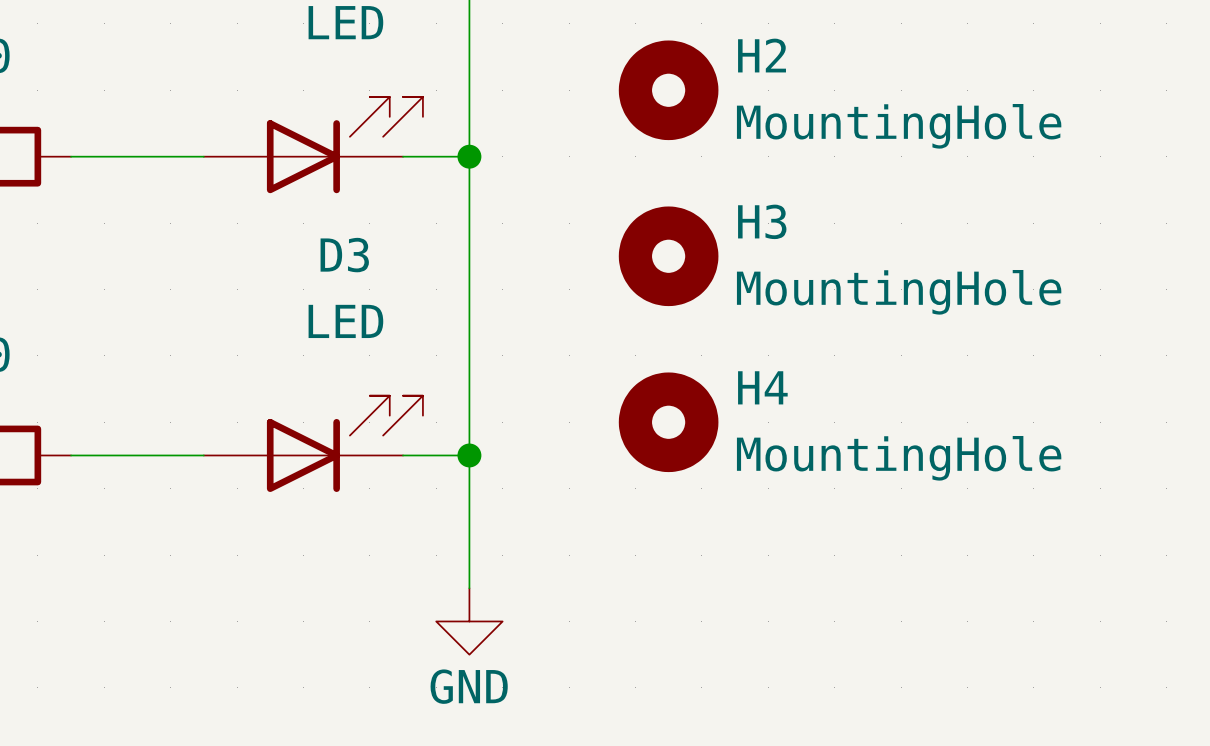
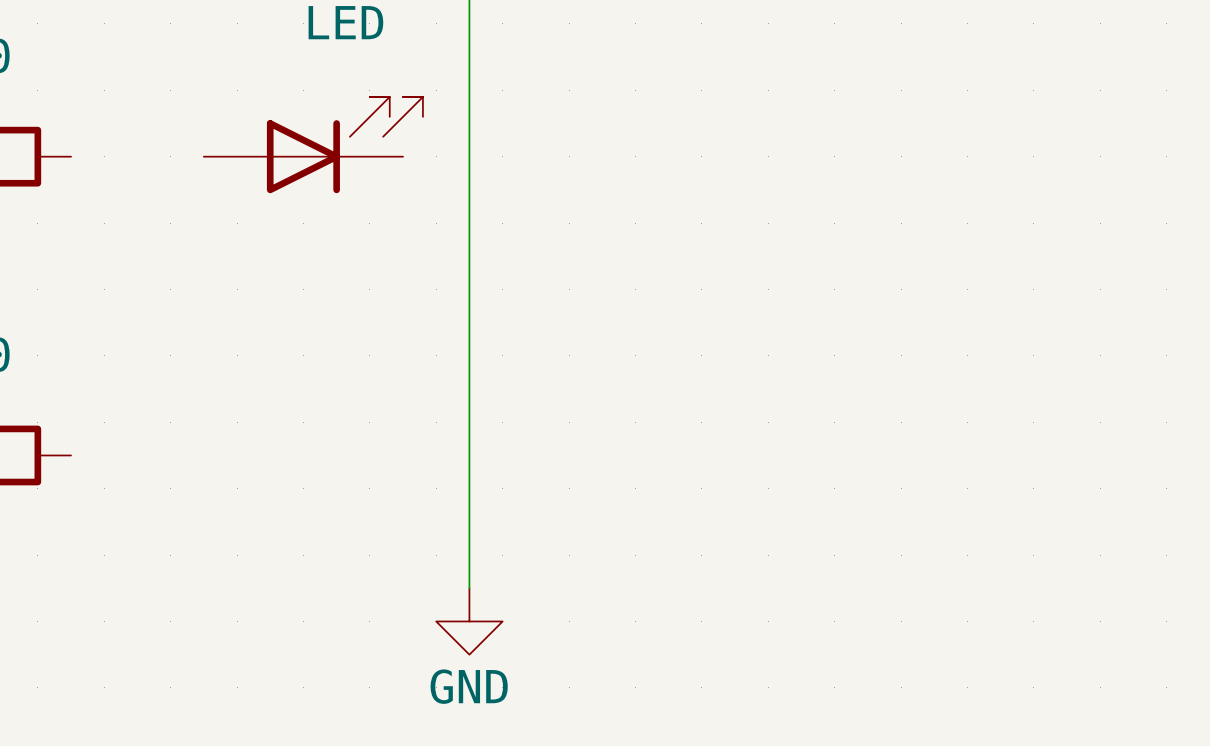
H2: MountingHole (668, 90) -> none
wire: (71, 156) (203, 156) -> none
wire: (403, 156) (469, 156) -> none
junction: (469, 156) -> none
H3: MountingHole (668, 256) -> none
H4: MountingHole (668, 422) -> none
D3: LED (313, 443) -> none
wire: (71, 455) (203, 455) -> none
wire: (403, 455) (469, 455) -> none
junction: (469, 455) -> none

